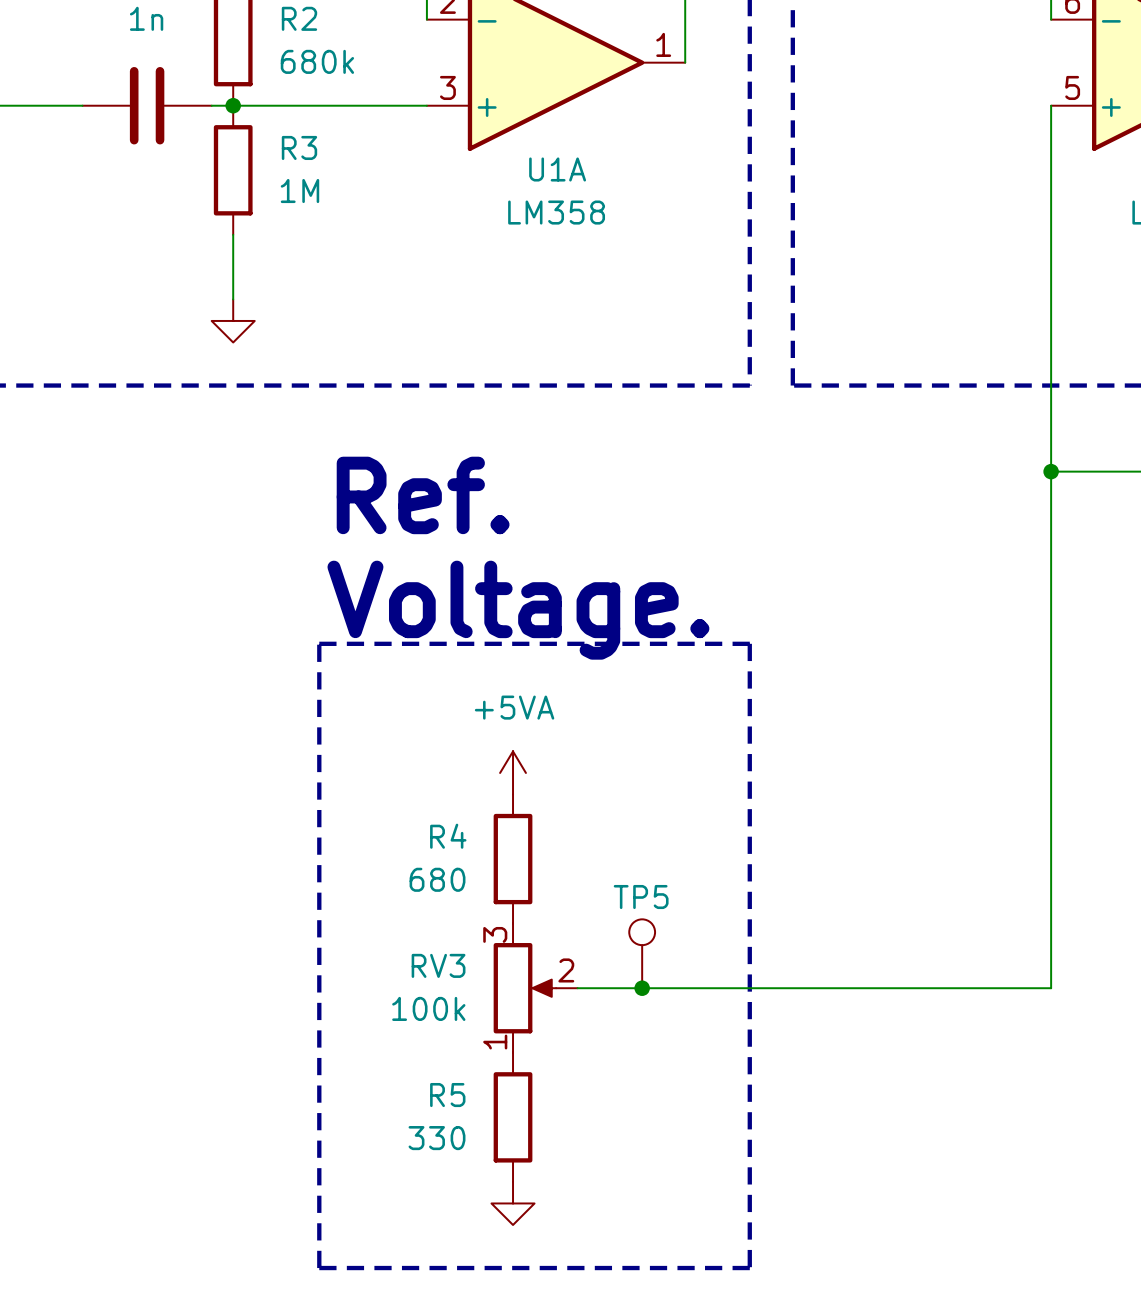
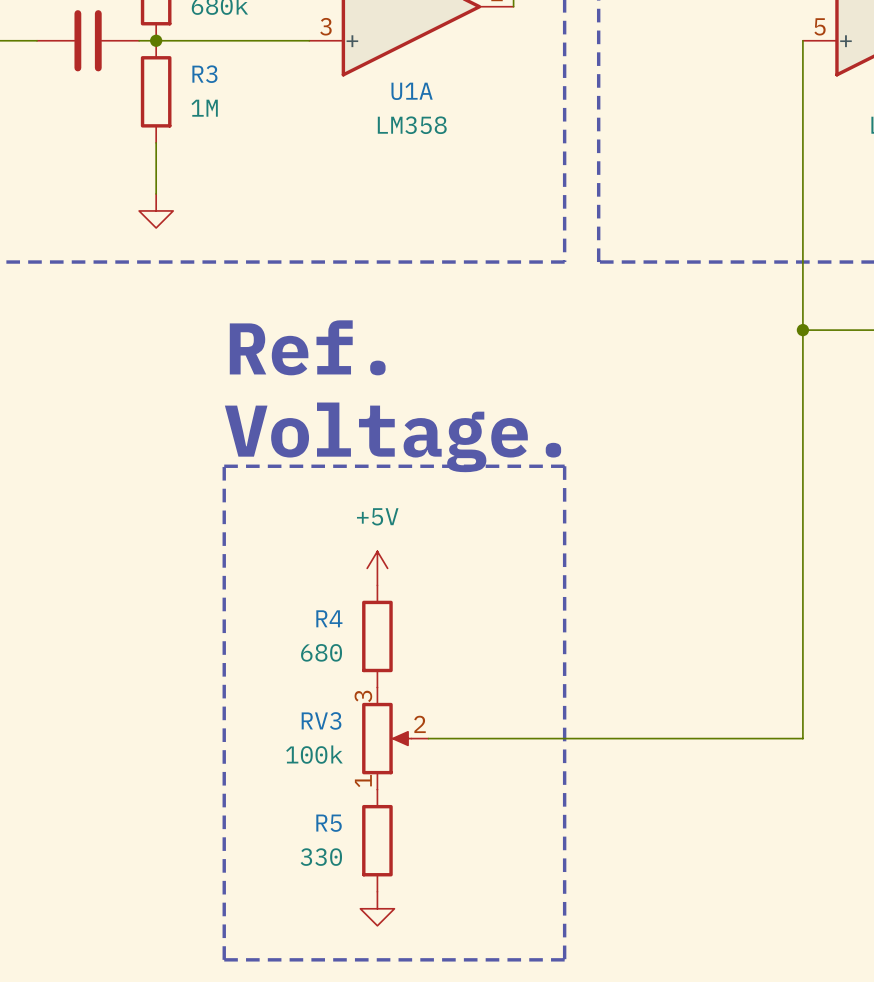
power symbol: +5VA (513, 772) -> +5V (377, 568)
TP5: (642, 953) -> none
junction: (642, 988) -> none

